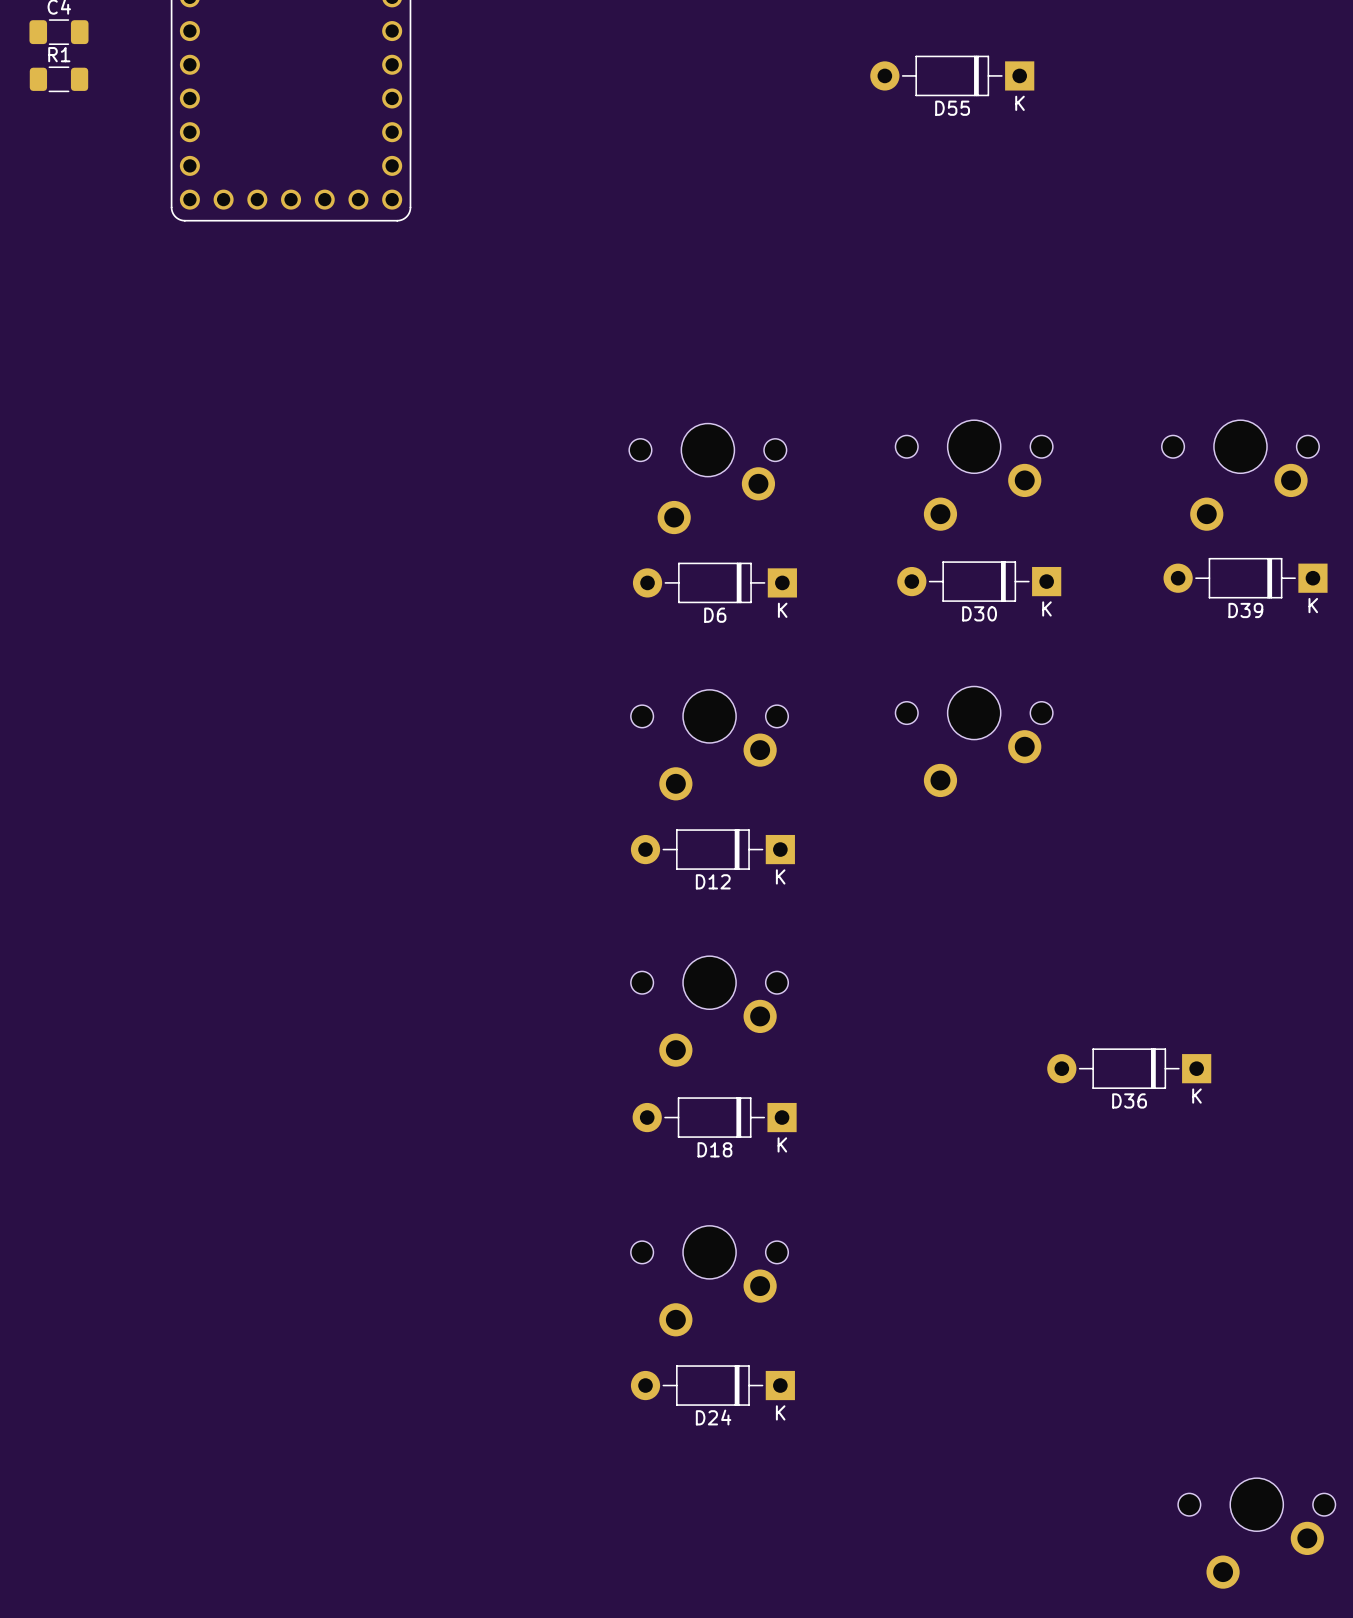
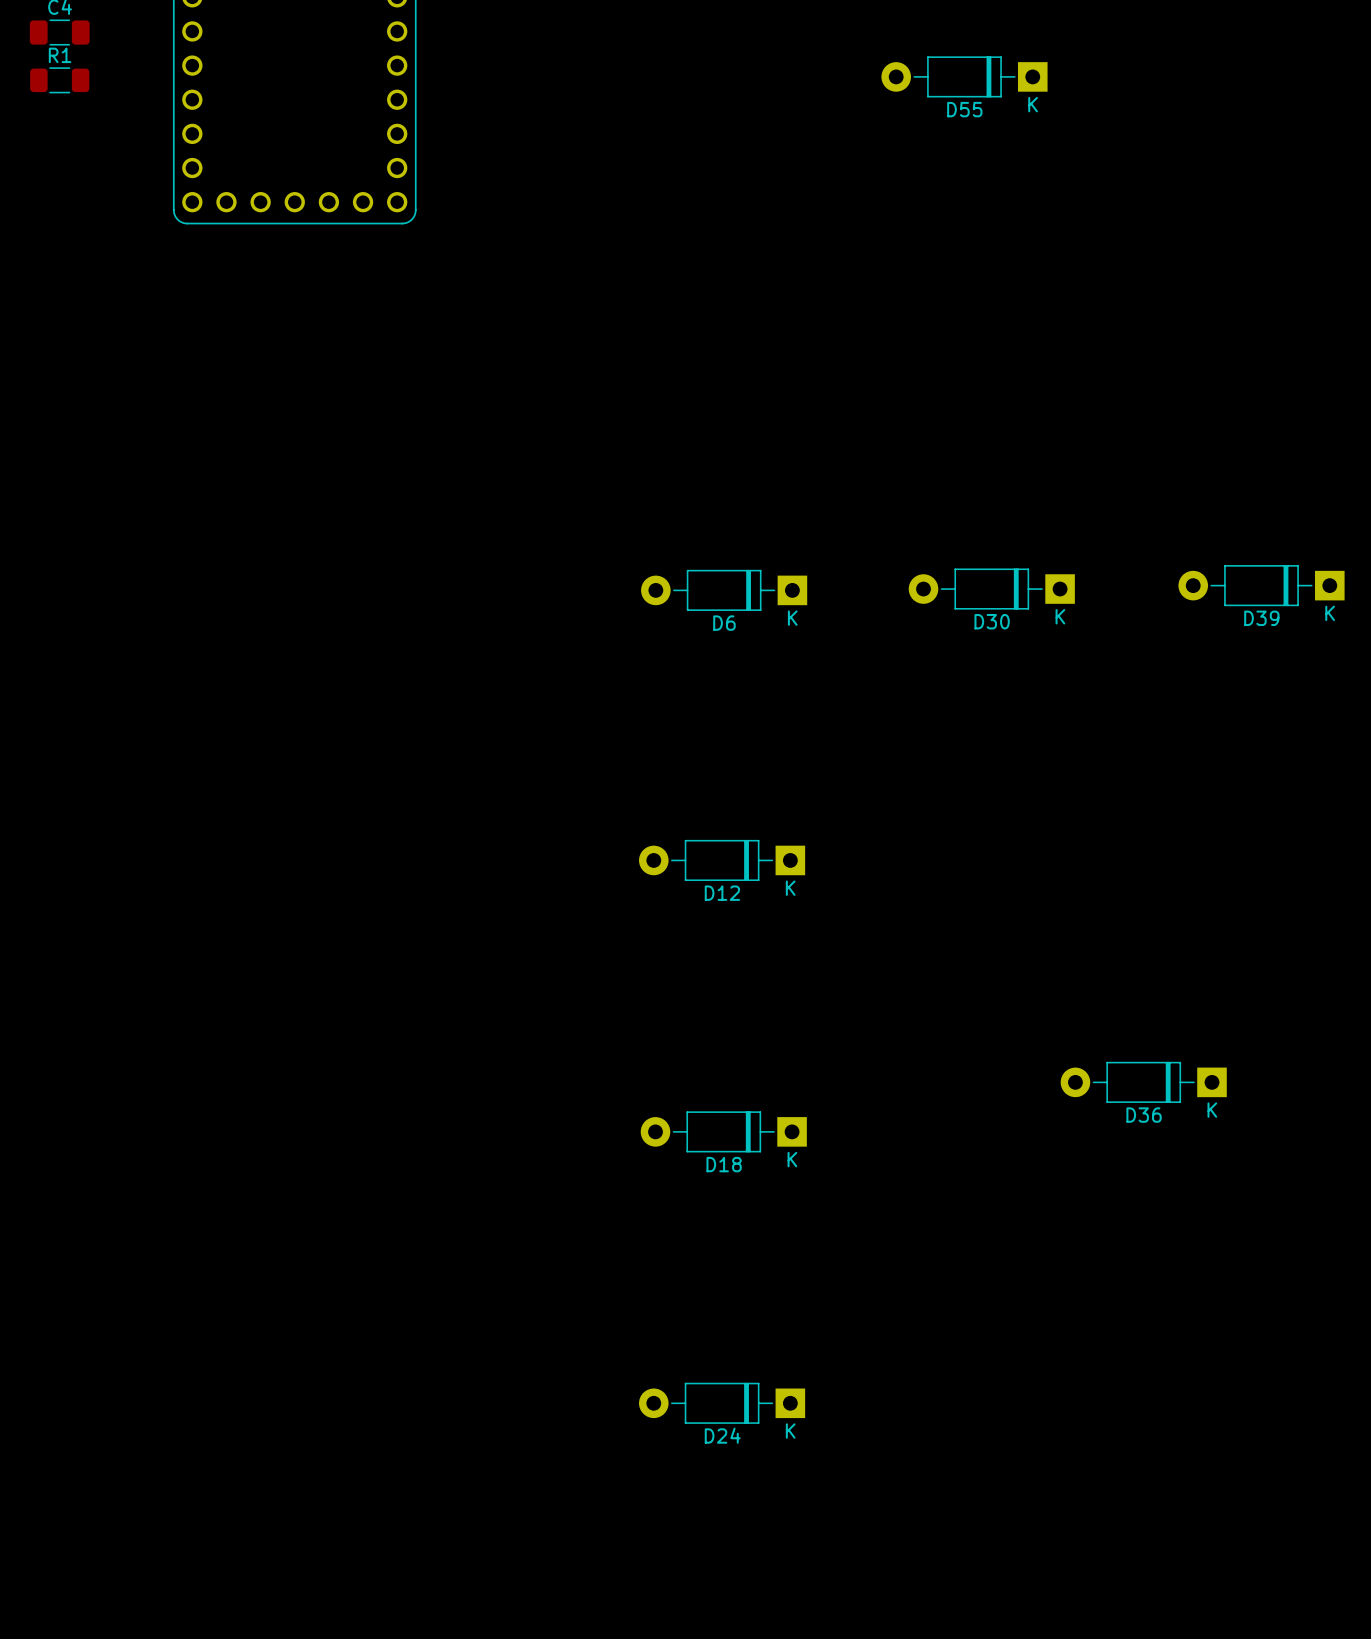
part: (974, 475) -> none
part: (1240, 475) -> none
part: (707, 478) -> none
part: (974, 741) -> none
part: (709, 745) -> none
part: (709, 1011) -> none
part: (709, 1281) -> none
part: (1256, 1533) -> none

